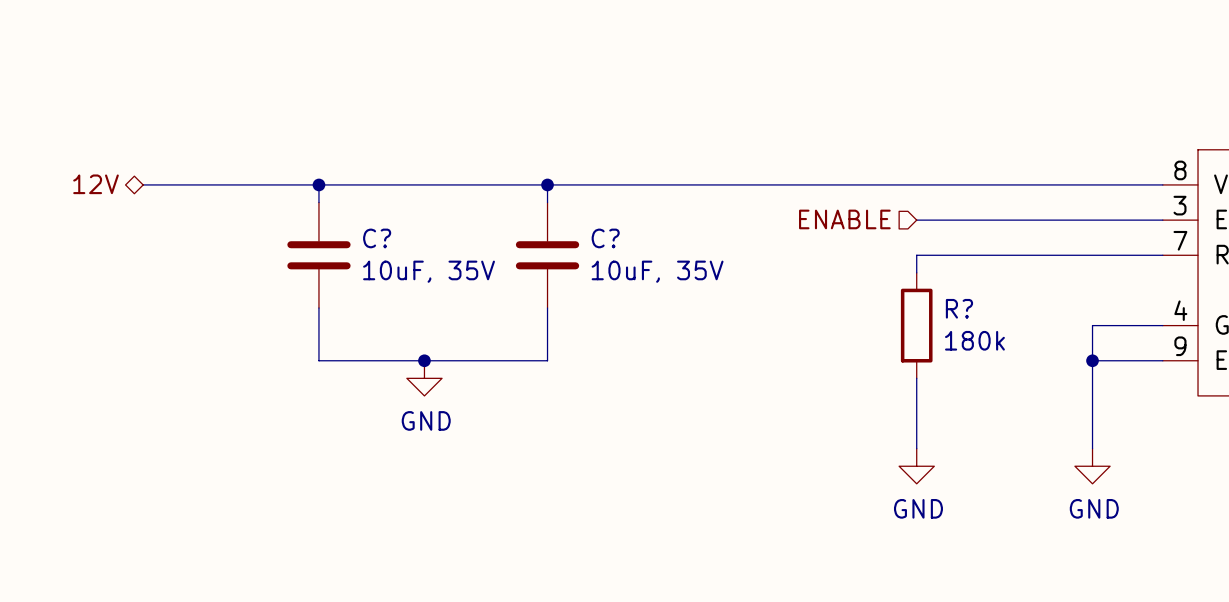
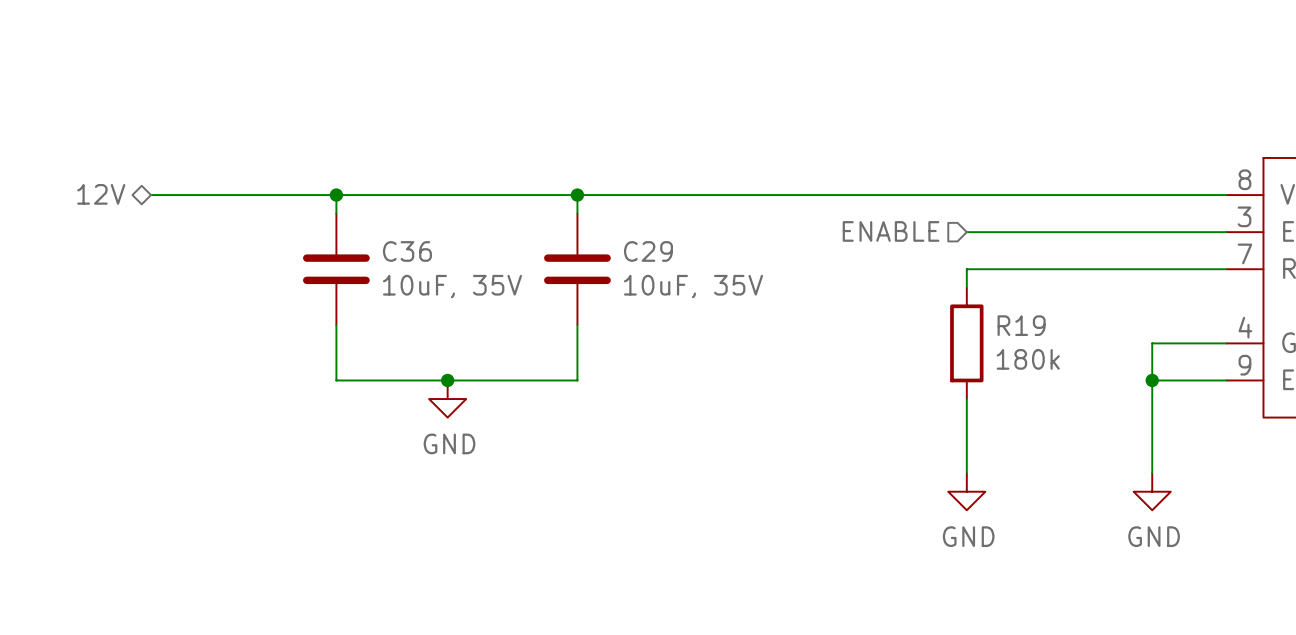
C? name: C? (377, 238) -> C36 (407, 251)
C? name: C? (605, 238) -> C29 (648, 251)
R? name: R? (959, 308) -> R19 (1021, 325)

